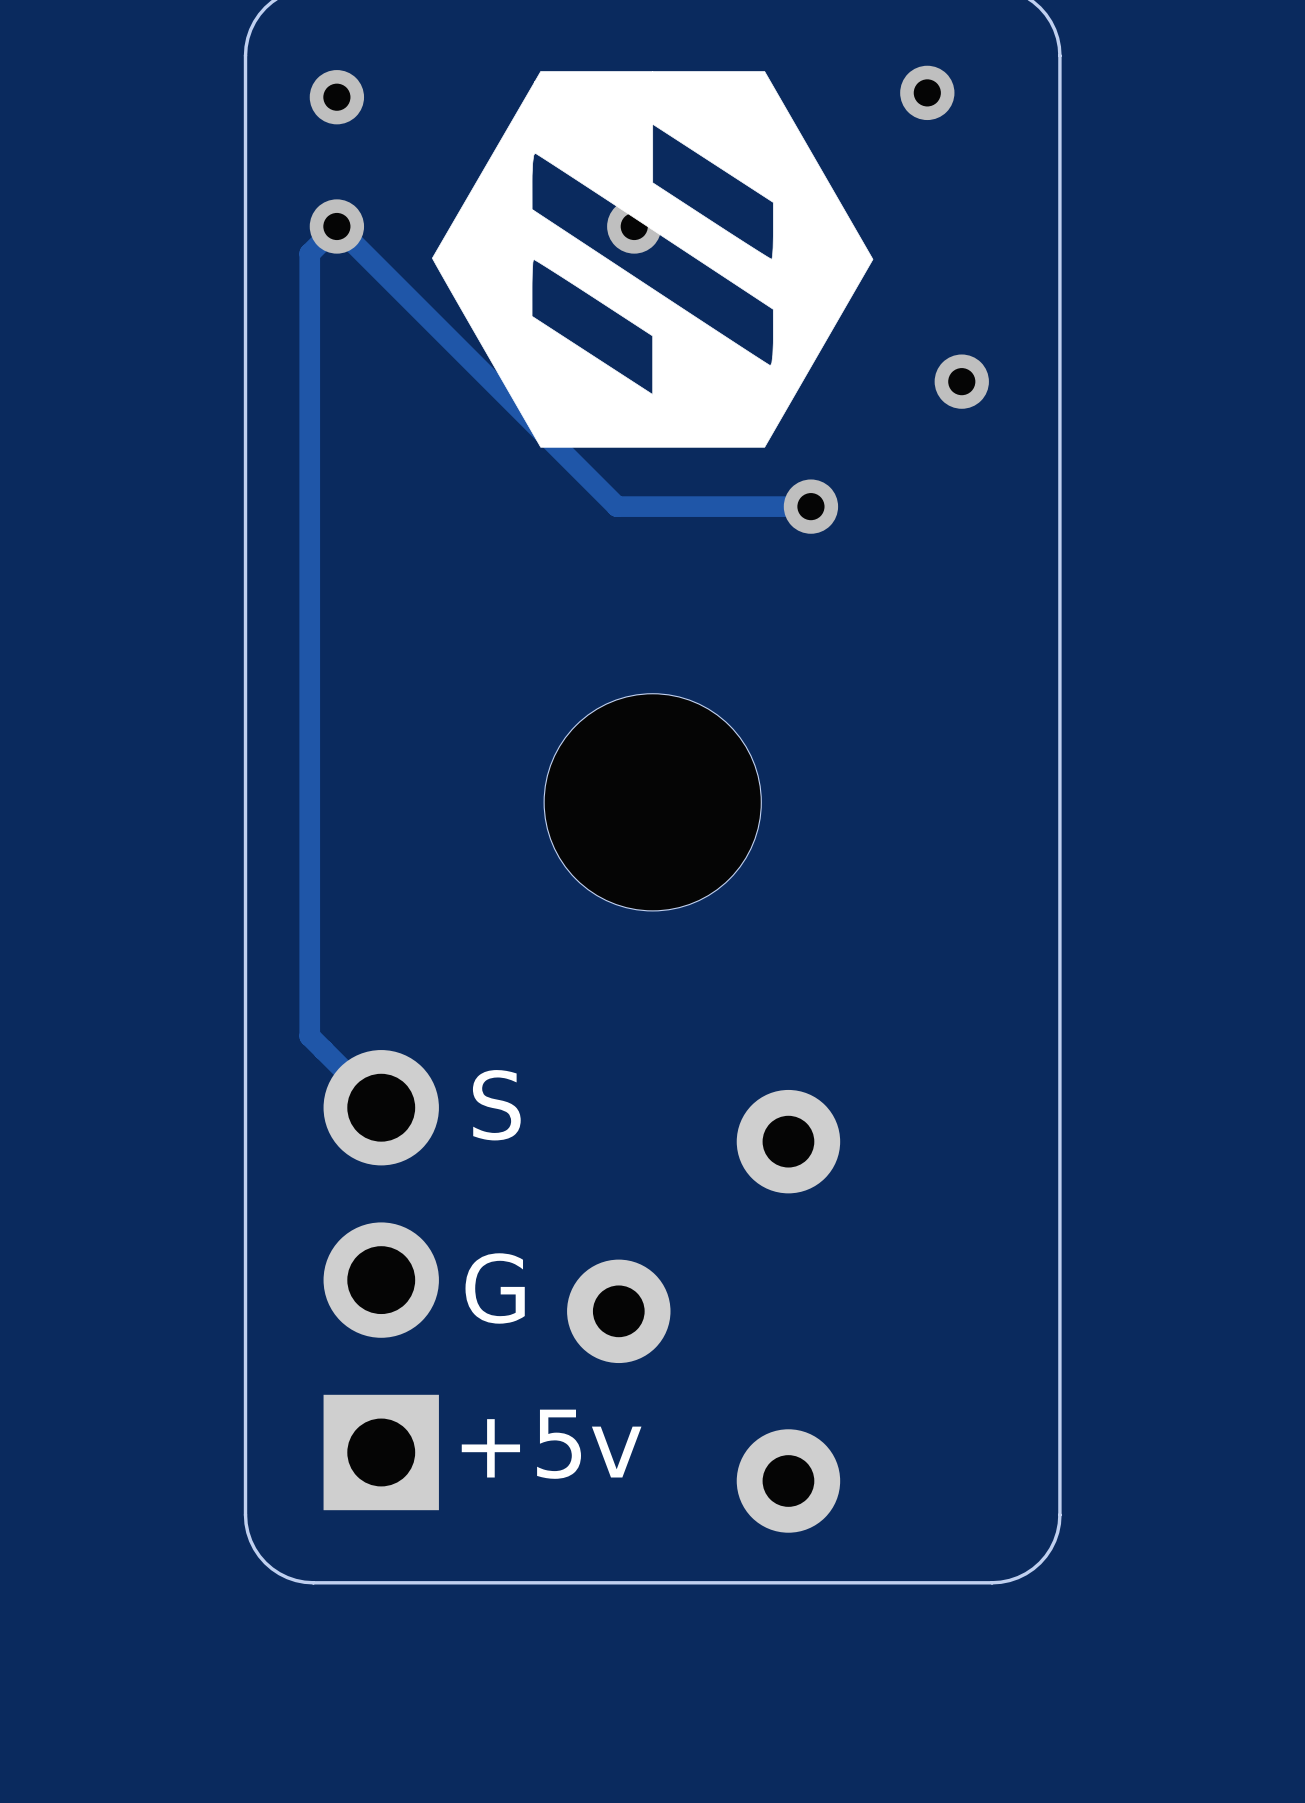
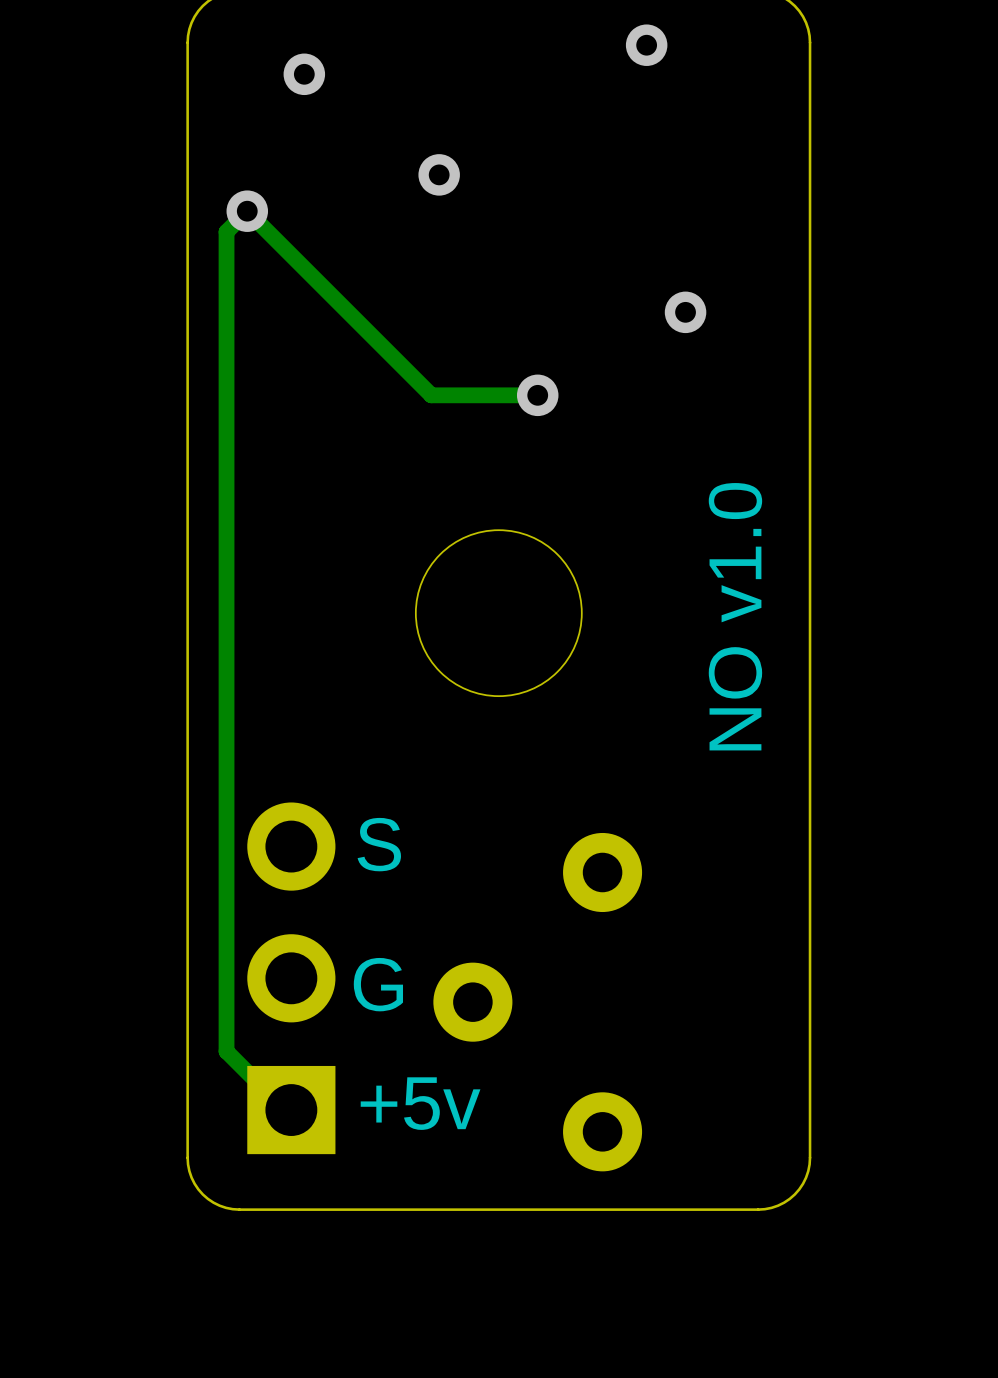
drawing: [432, 71, 874, 448] -> none
via position: (927, 92) -> (646, 45)
via position: (336, 97) -> (304, 74)
via position: (336, 226) -> (247, 211)
via position: (634, 226) -> (439, 174)
via: (961, 381) -> none
via: none -> (685, 312)
track: (810, 506) (617, 506) (336, 226) (309, 253) (309, 1036) (381, 1107) -> none
via: (810, 506) -> none
via: none -> (537, 395)
track: none -> (535, 397) (537, 395) (431, 395) (247, 211) (226, 231) (226, 1051) (285, 1110) (291, 1110)
text: none -> NO v1.0 (735, 616)

